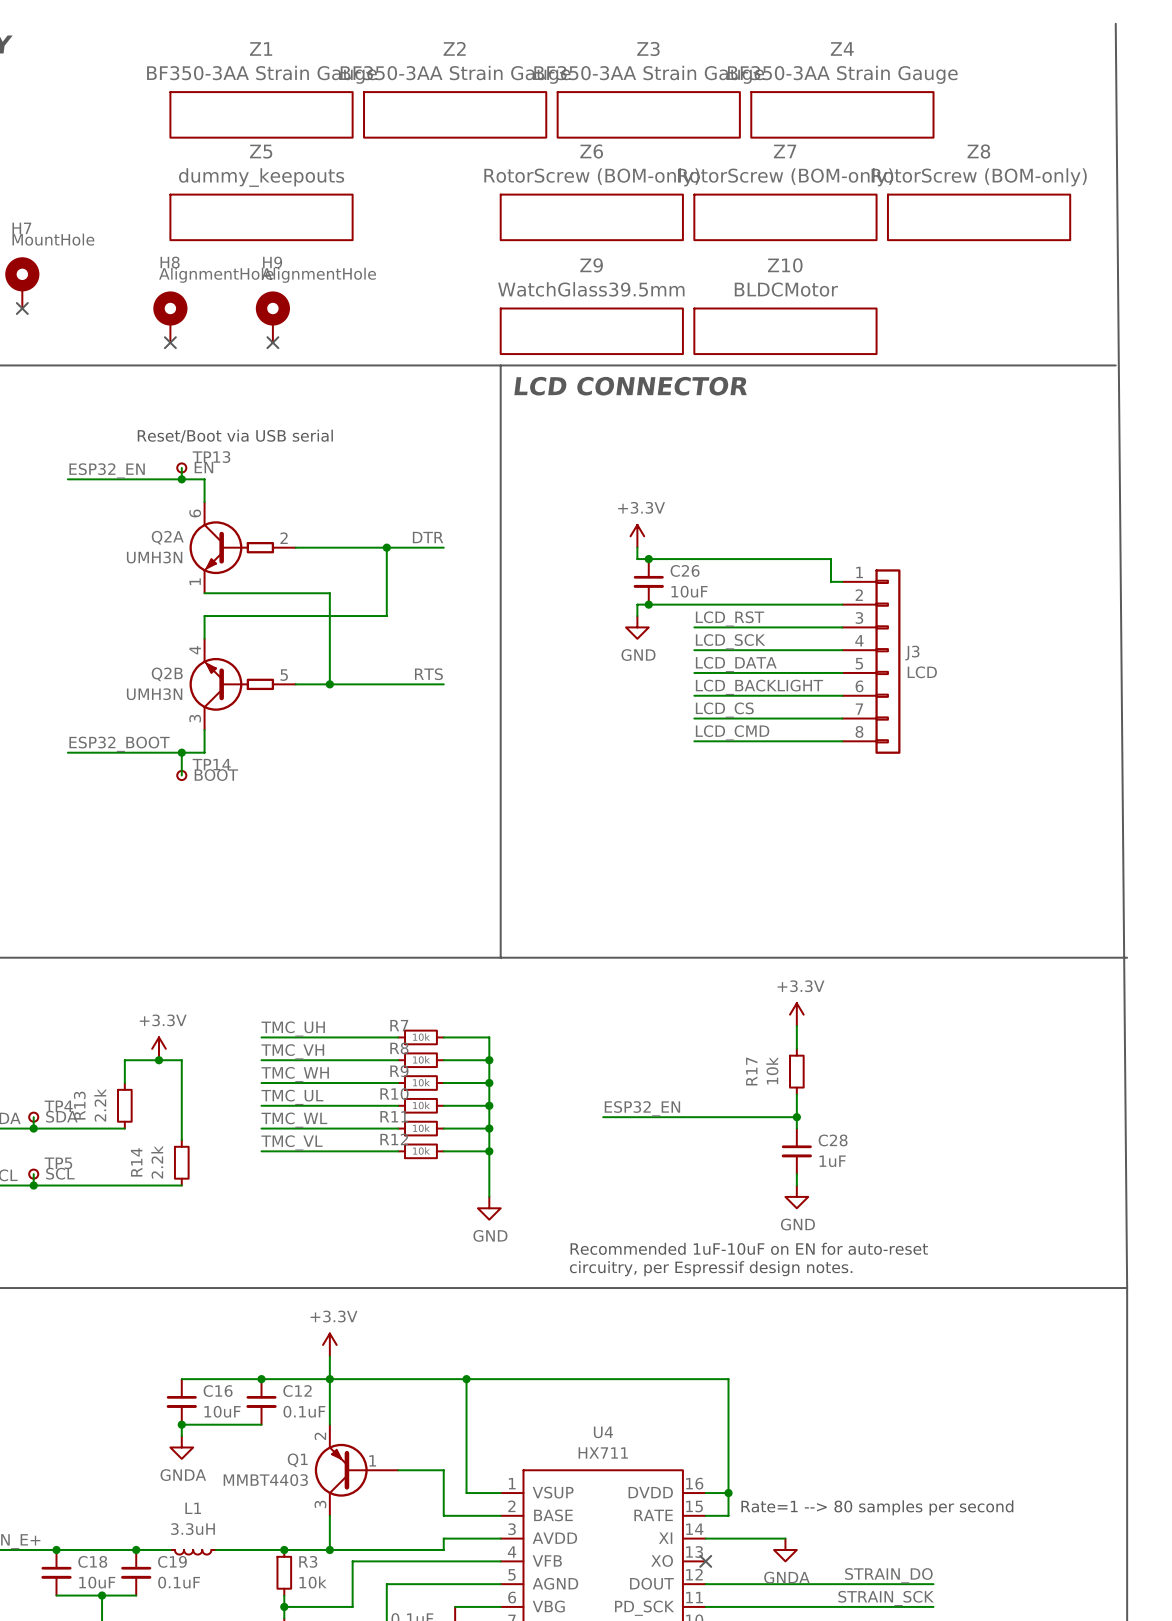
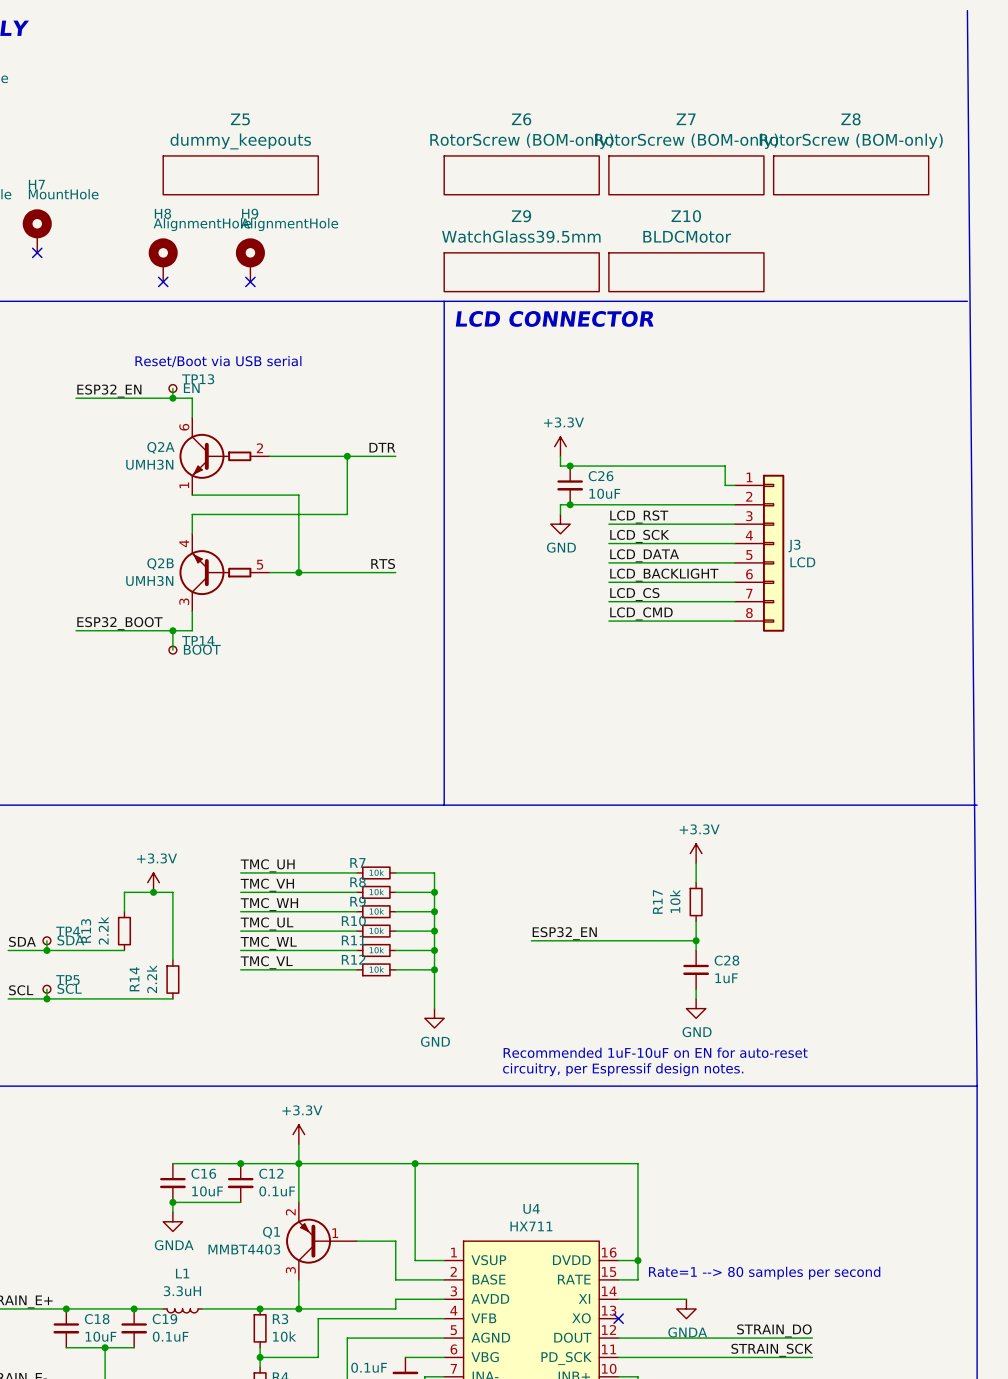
Z1: BF350-3AA Strain Gauge (261, 114) -> none
Z2: BF350-3AA Strain Gauge (455, 114) -> none
Z3: BF350-3AA Strain Gauge (648, 114) -> none
Z4: BF350-3AA Strain Gauge (842, 114) -> none

